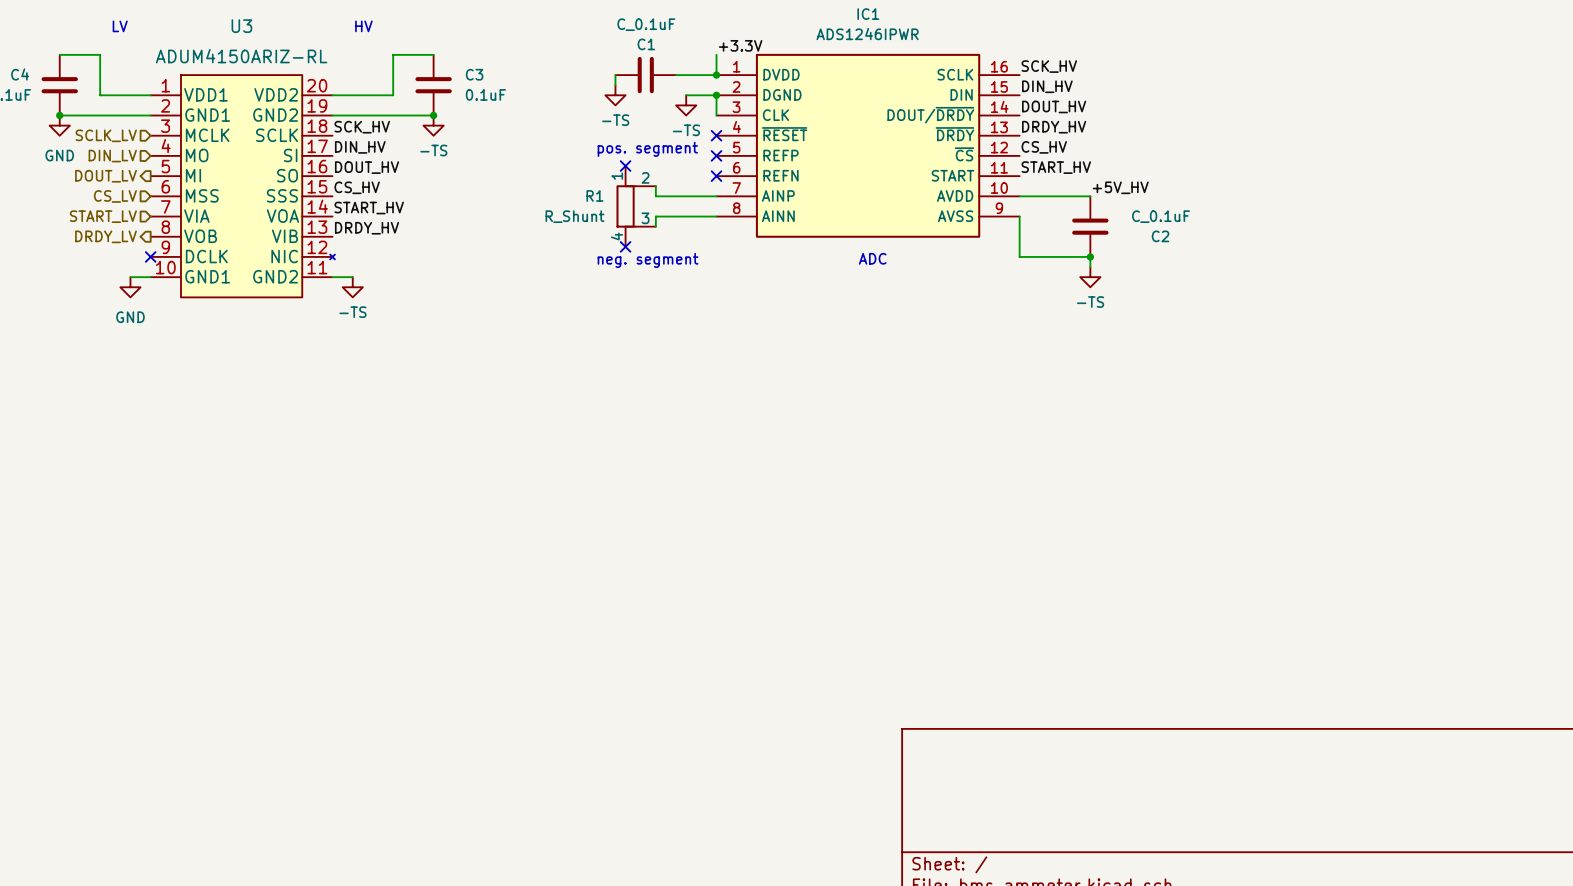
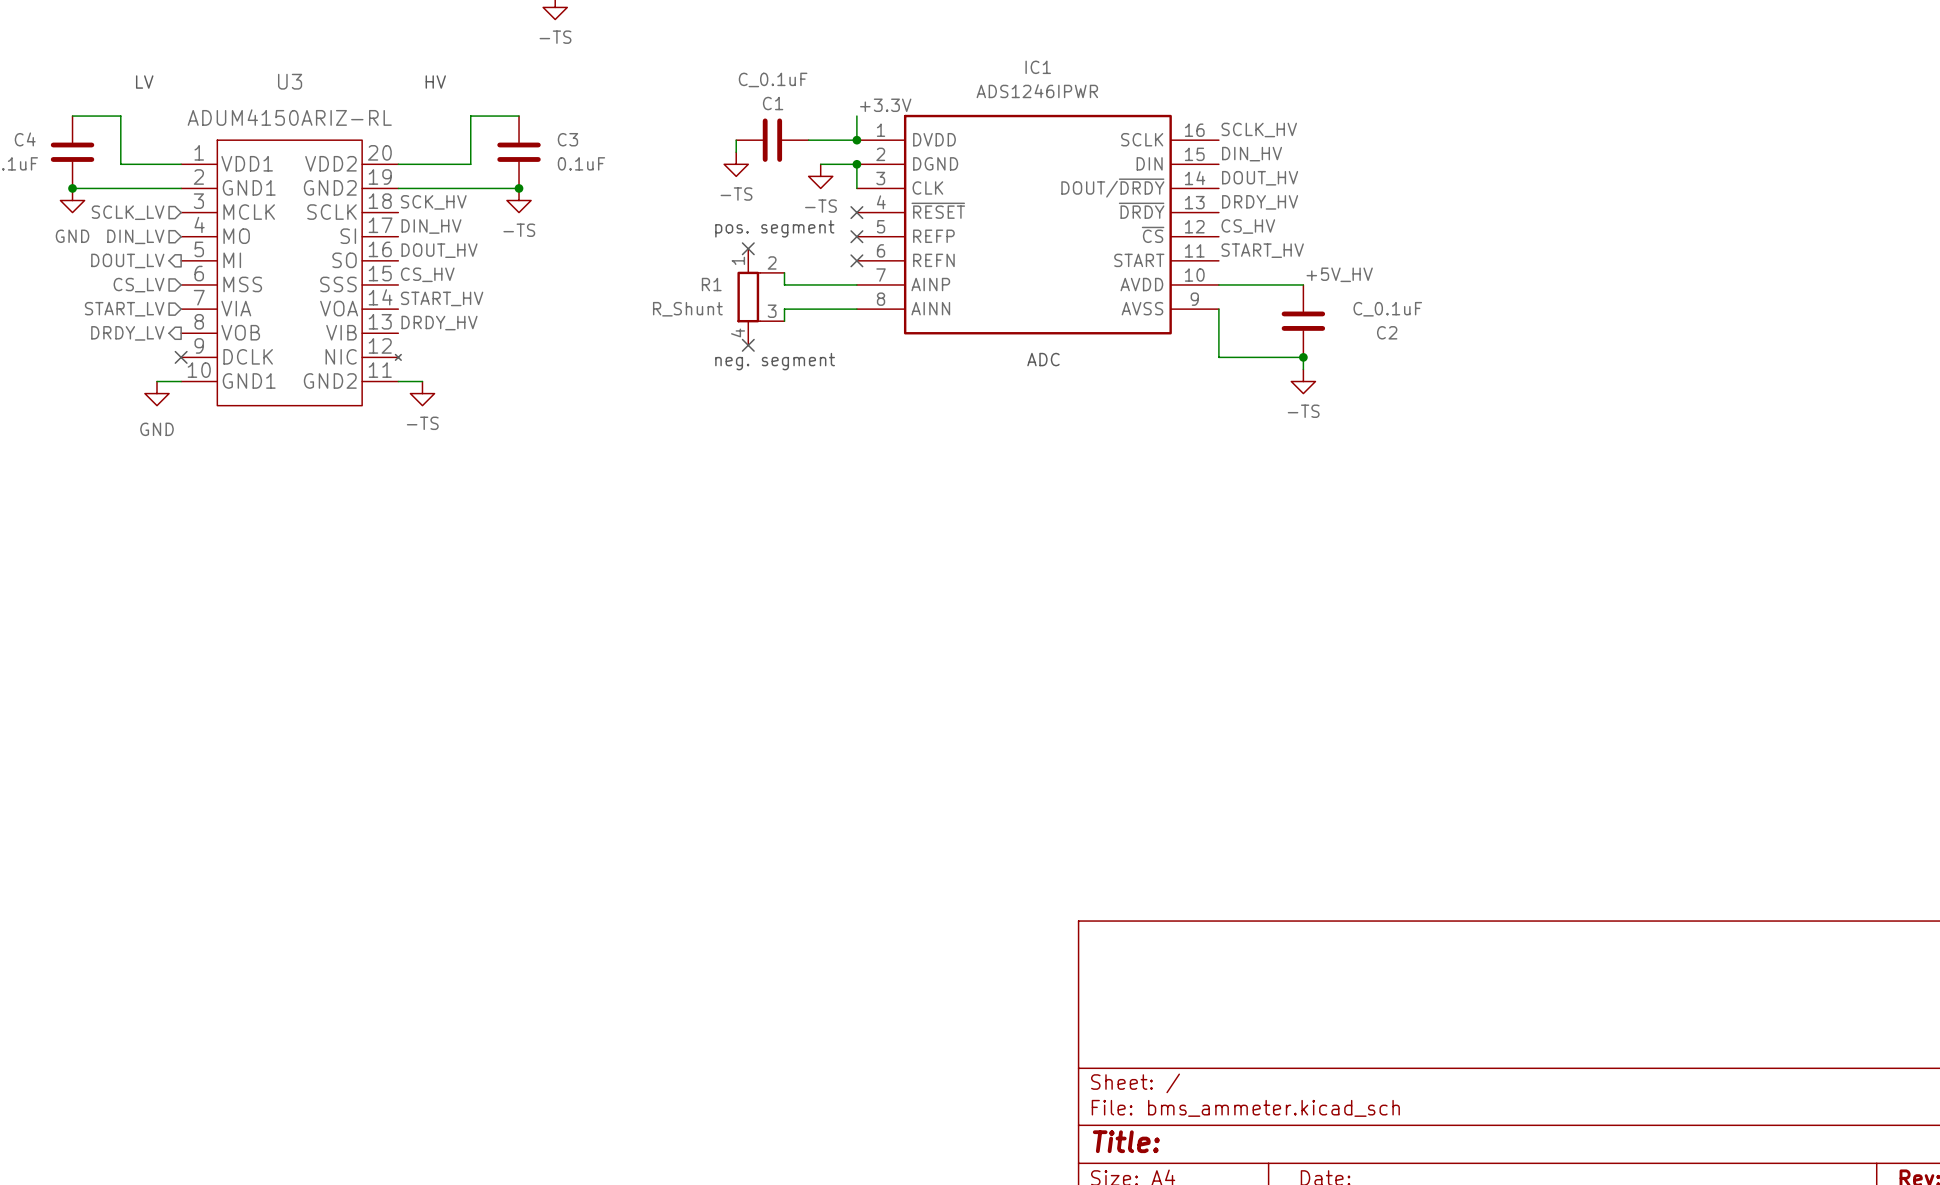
label: SCK_HV (1049, 66) -> SCLK_HV (1259, 129)

